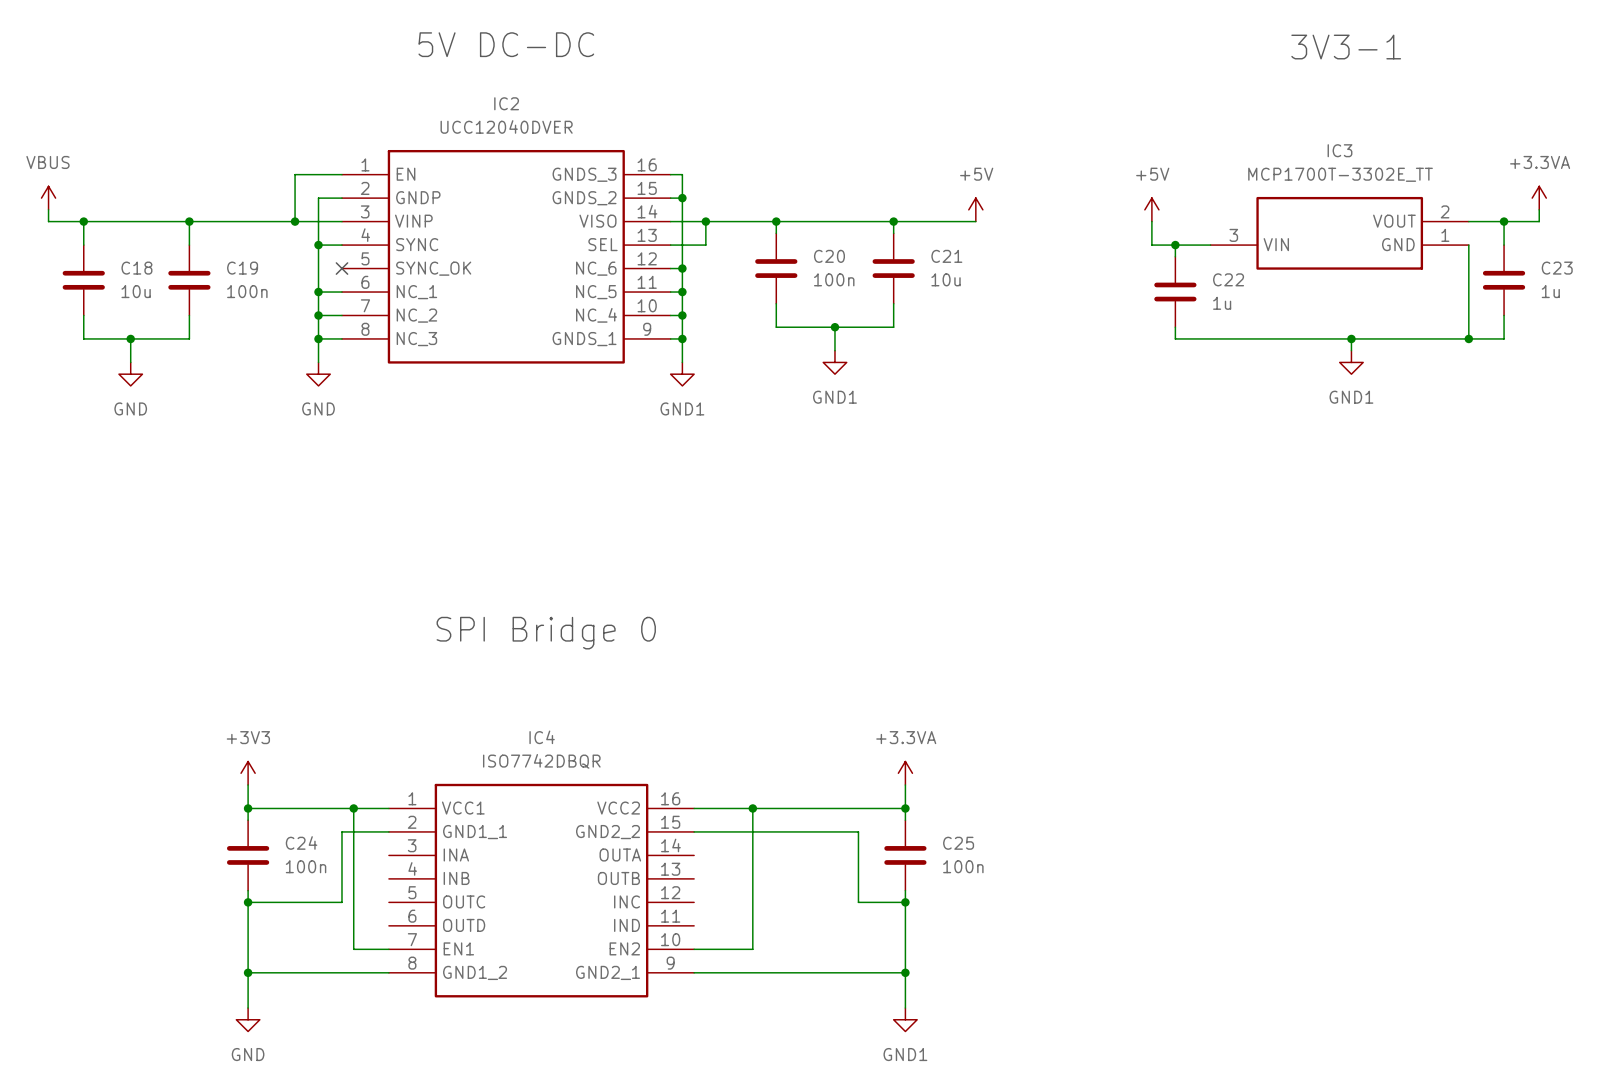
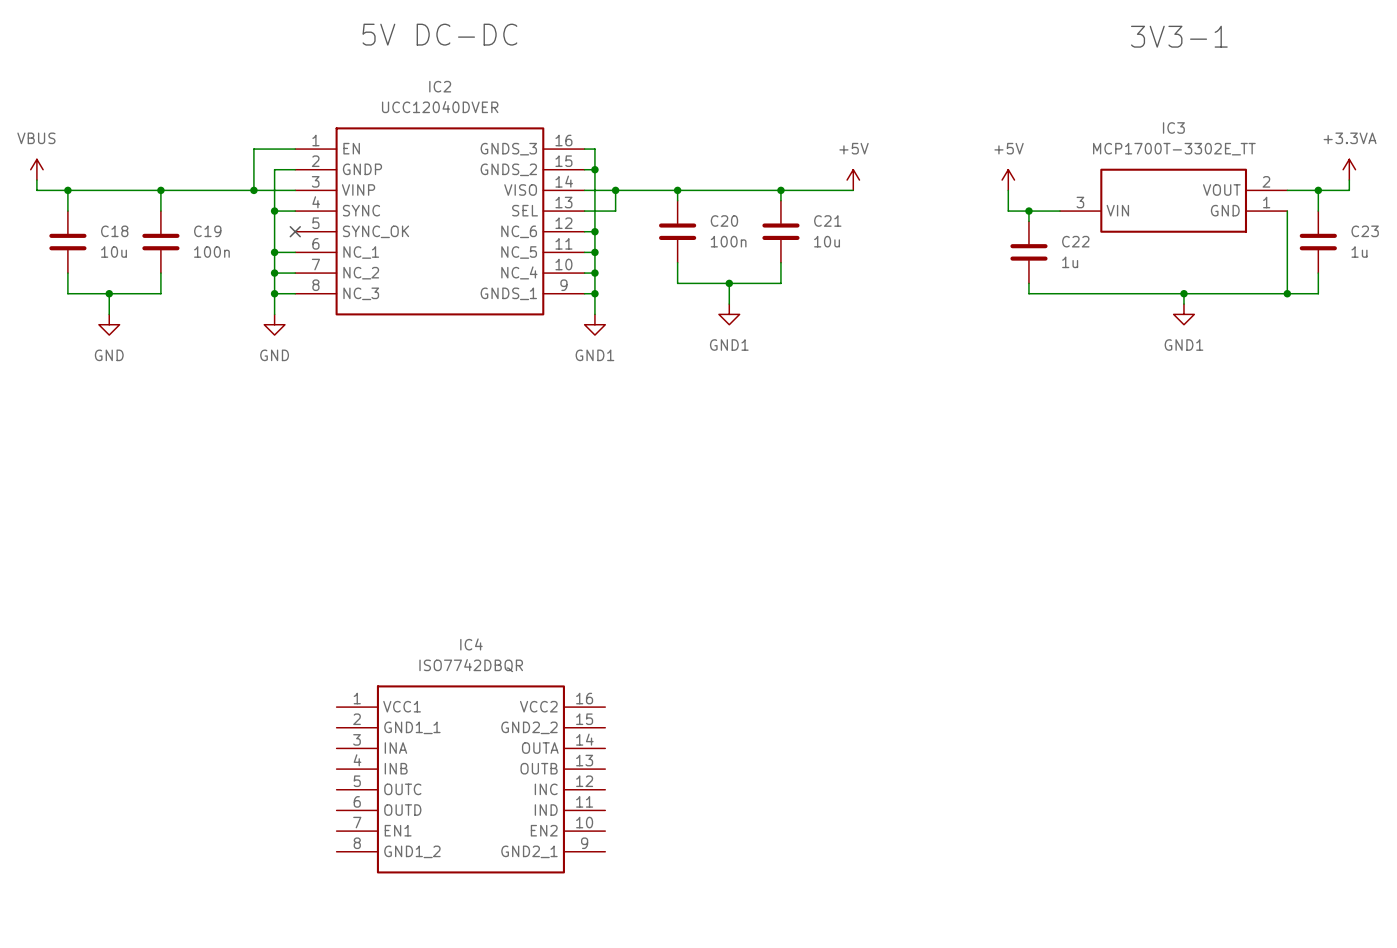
text: SPI Bridge 0 (546, 633) -> none
power symbol: +3V3 (248, 773) -> none
power symbol: +3.3VA (905, 773) -> none
wire: (248, 785) (248, 820) -> none
wire: (905, 785) (905, 820) -> none
wire: (248, 808) (388, 808) -> none
junction: (248, 808) -> none
wire: (353, 808) (353, 949) (388, 949) -> none
junction: (353, 808) -> none
wire: (694, 808) (905, 808) -> none
wire: (752, 808) (752, 949) (694, 949) -> none
junction: (752, 808) -> none
junction: (905, 808) -> none
wire: (388, 831) (341, 831) (341, 902) (248, 902) -> none
wire: (694, 831) (858, 831) (858, 902) (905, 902) -> none
C24: 100n (248, 855) -> none
C25: 100n (905, 855) -> none
wire: (248, 890) (248, 1008) -> none
wire: (905, 890) (905, 1008) -> none
junction: (248, 902) -> none
junction: (905, 902) -> none
wire: (248, 972) (388, 972) -> none
junction: (248, 972) -> none
wire: (694, 972) (905, 972) -> none
junction: (905, 972) -> none
power symbol: GND (248, 1019) -> none
power symbol: GND1 (905, 1019) -> none

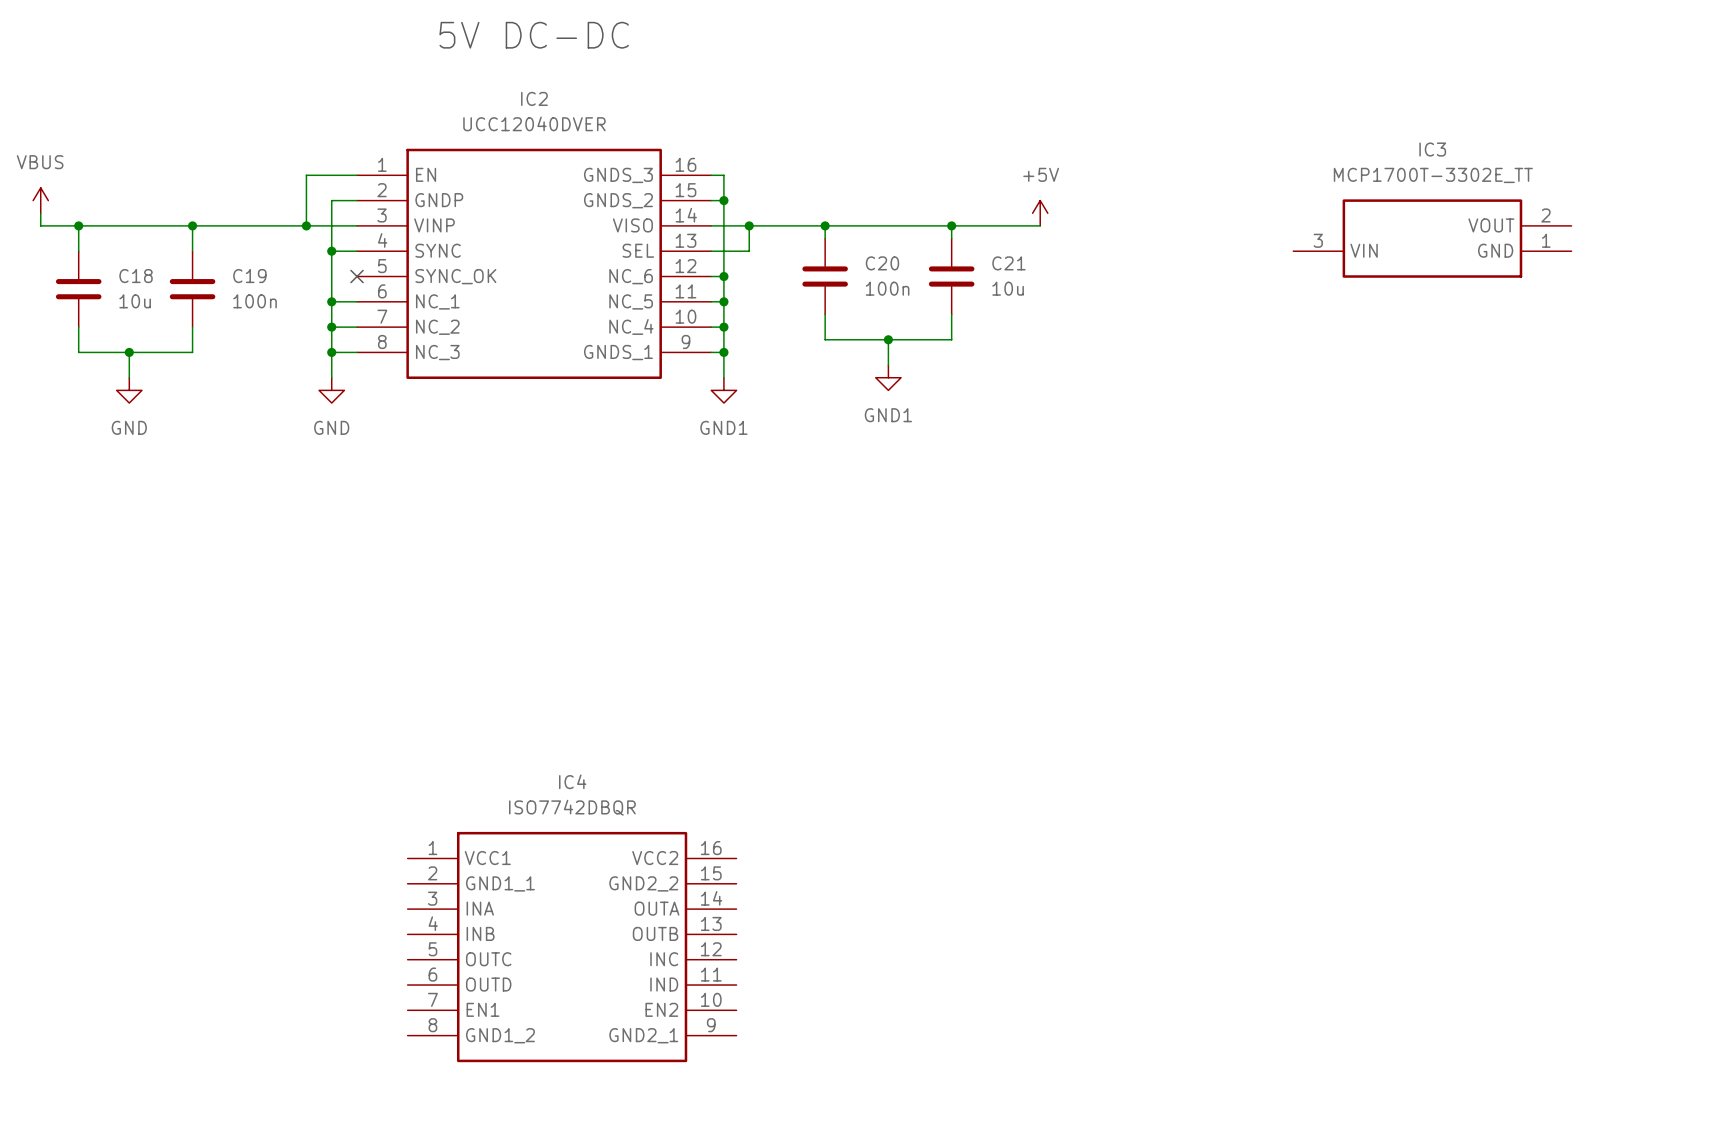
text: 3V3-1 (1179, 36) -> none
power symbol: +3.3VA (1349, 169) -> none
power symbol: +5V (1008, 180) -> none
wire: (1349, 180) (1349, 190) (1287, 190) -> none
wire: (1008, 190) (1008, 211) (1059, 211) -> none
wire: (1318, 190) (1318, 211) -> none
junction: (1318, 190) -> none
wire: (1028, 211) (1028, 221) -> none
junction: (1028, 211) -> none
wire: (1287, 211) (1287, 293) -> none
C23: 1u (1318, 242) -> none
C22: 1u (1028, 252) -> none
wire: (1318, 273) (1318, 293) (1028, 293) (1028, 283) -> none
wire: (1183, 293) (1183, 304) -> none
junction: (1183, 293) -> none
junction: (1287, 293) -> none
power symbol: GND1 (1183, 314) -> none

